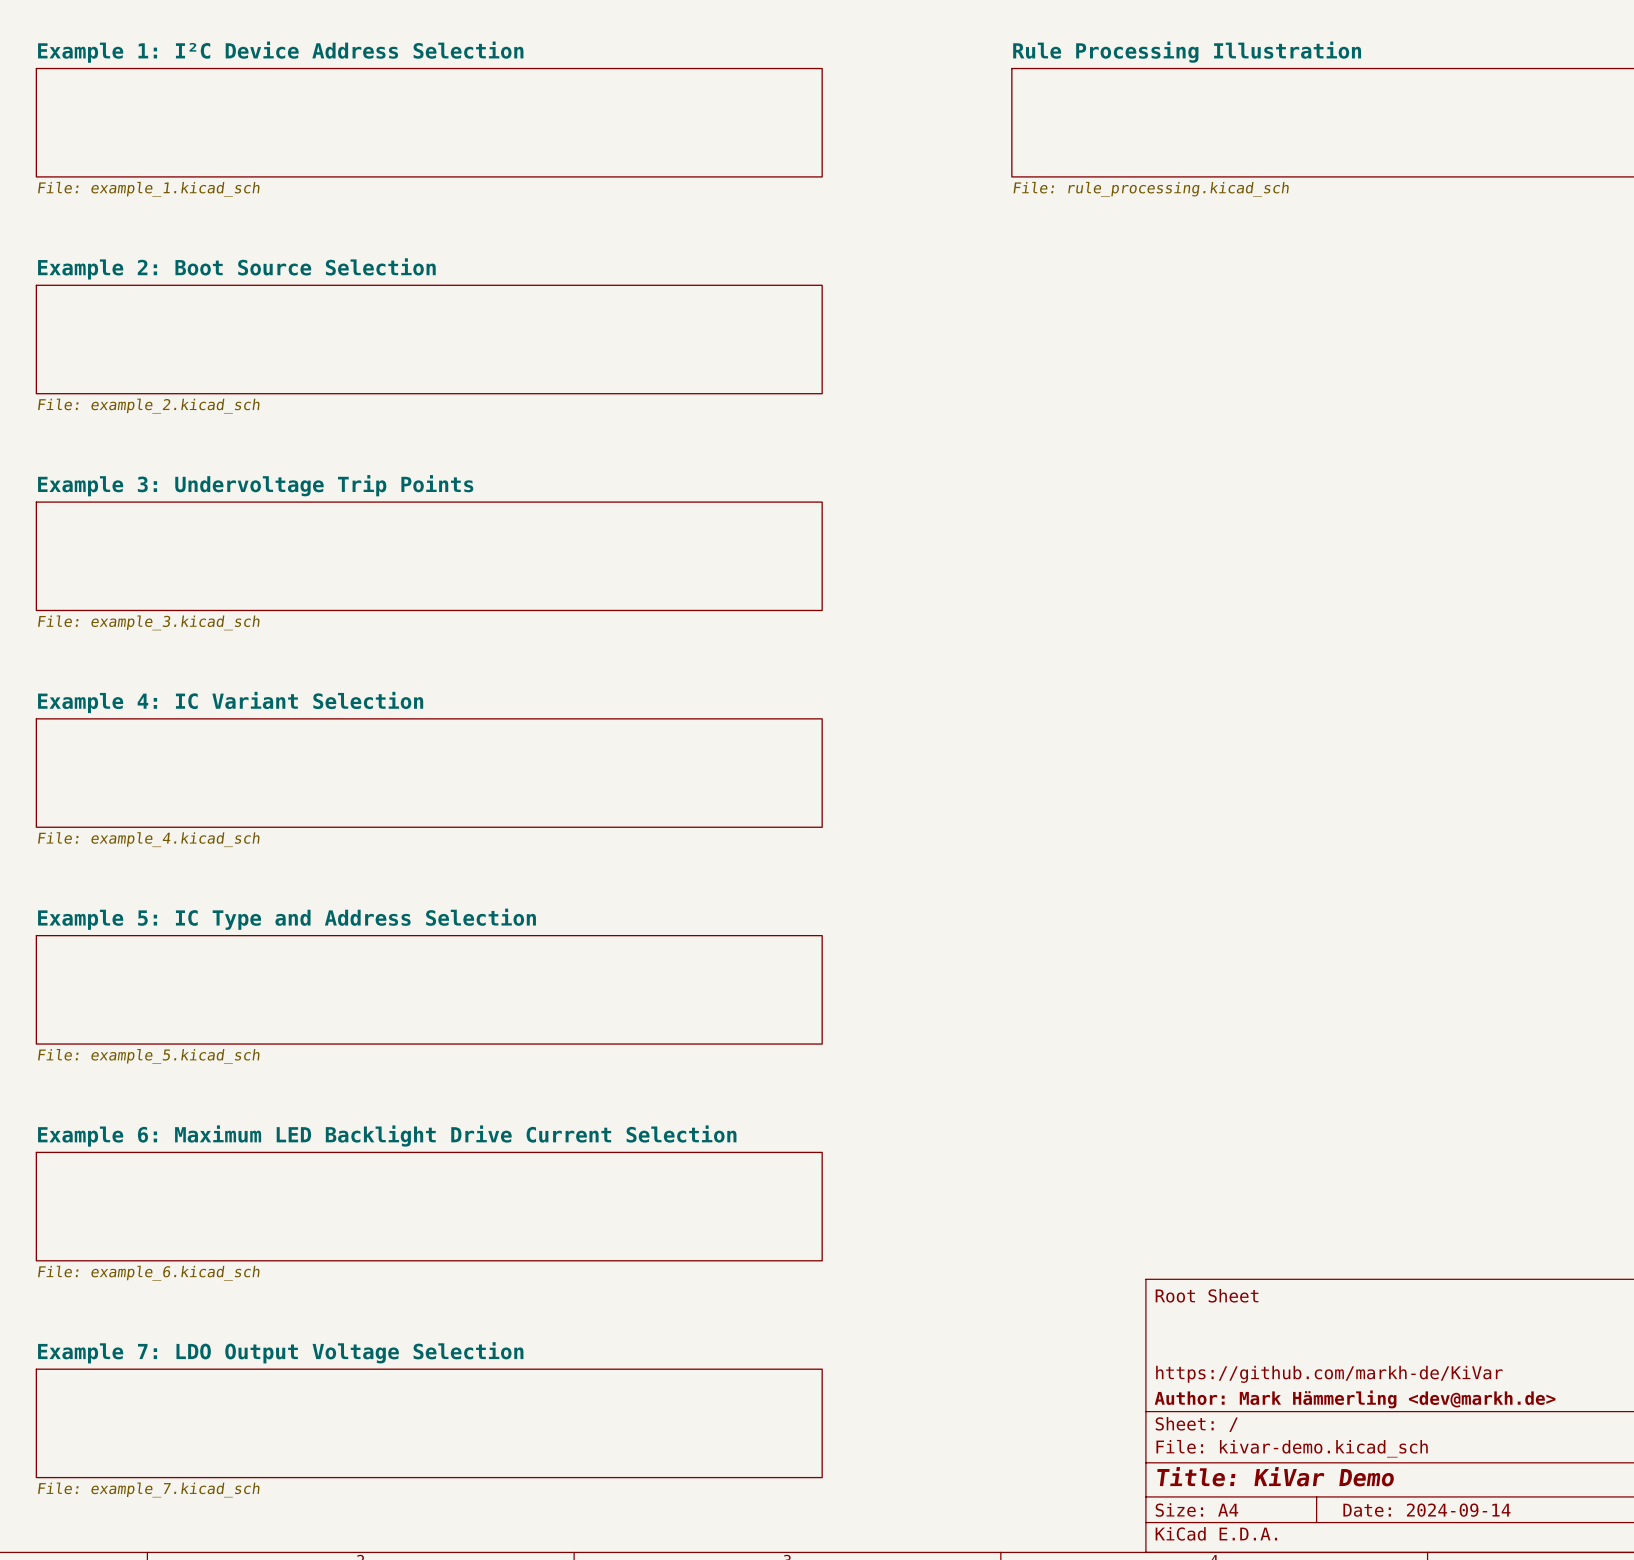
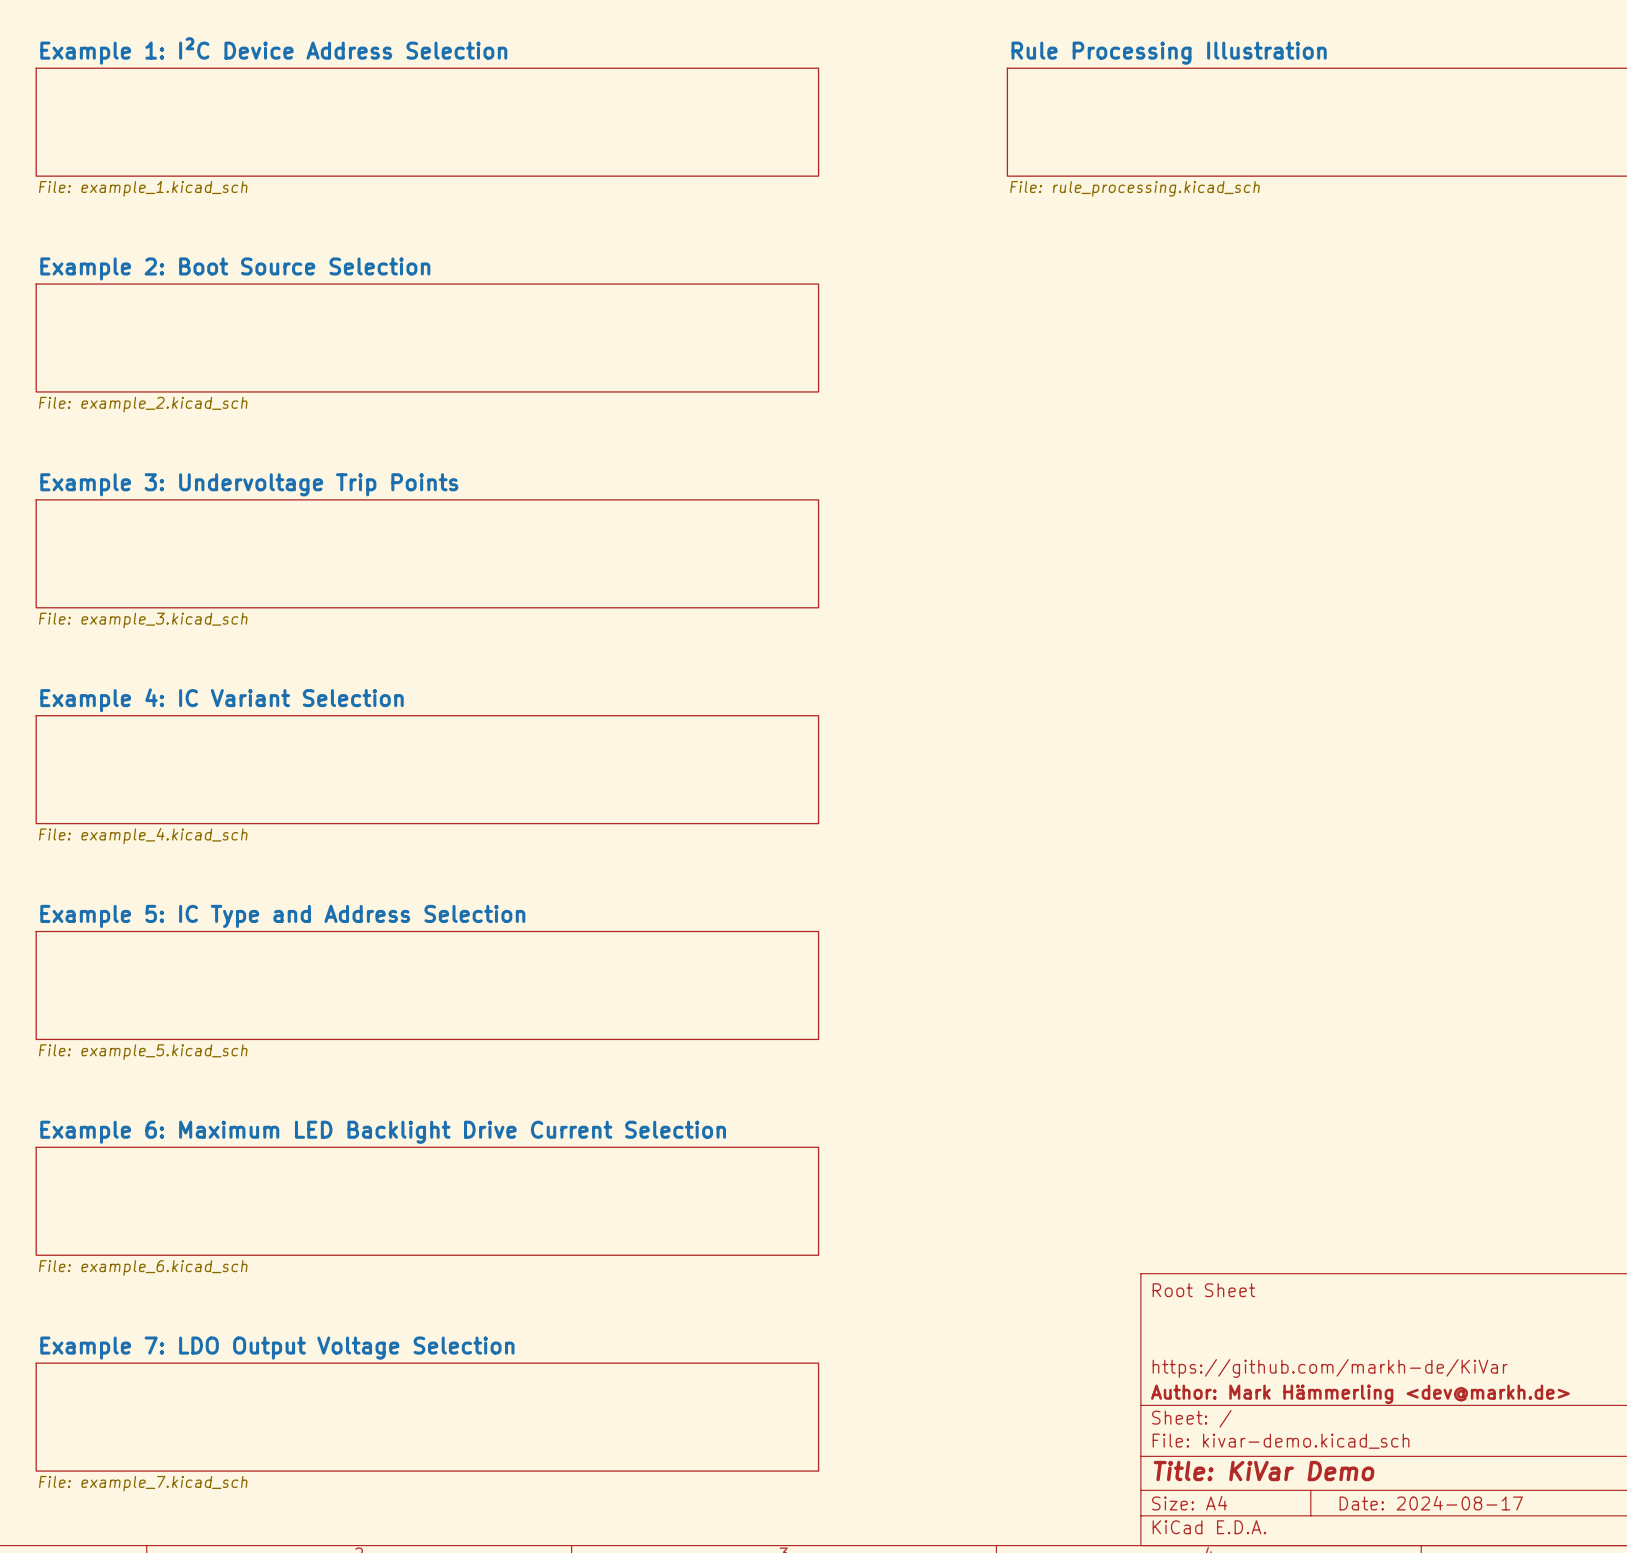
title block: Date: 2024-09-14 (1426, 1510) -> Date: 2024-08-17 (1431, 1503)

